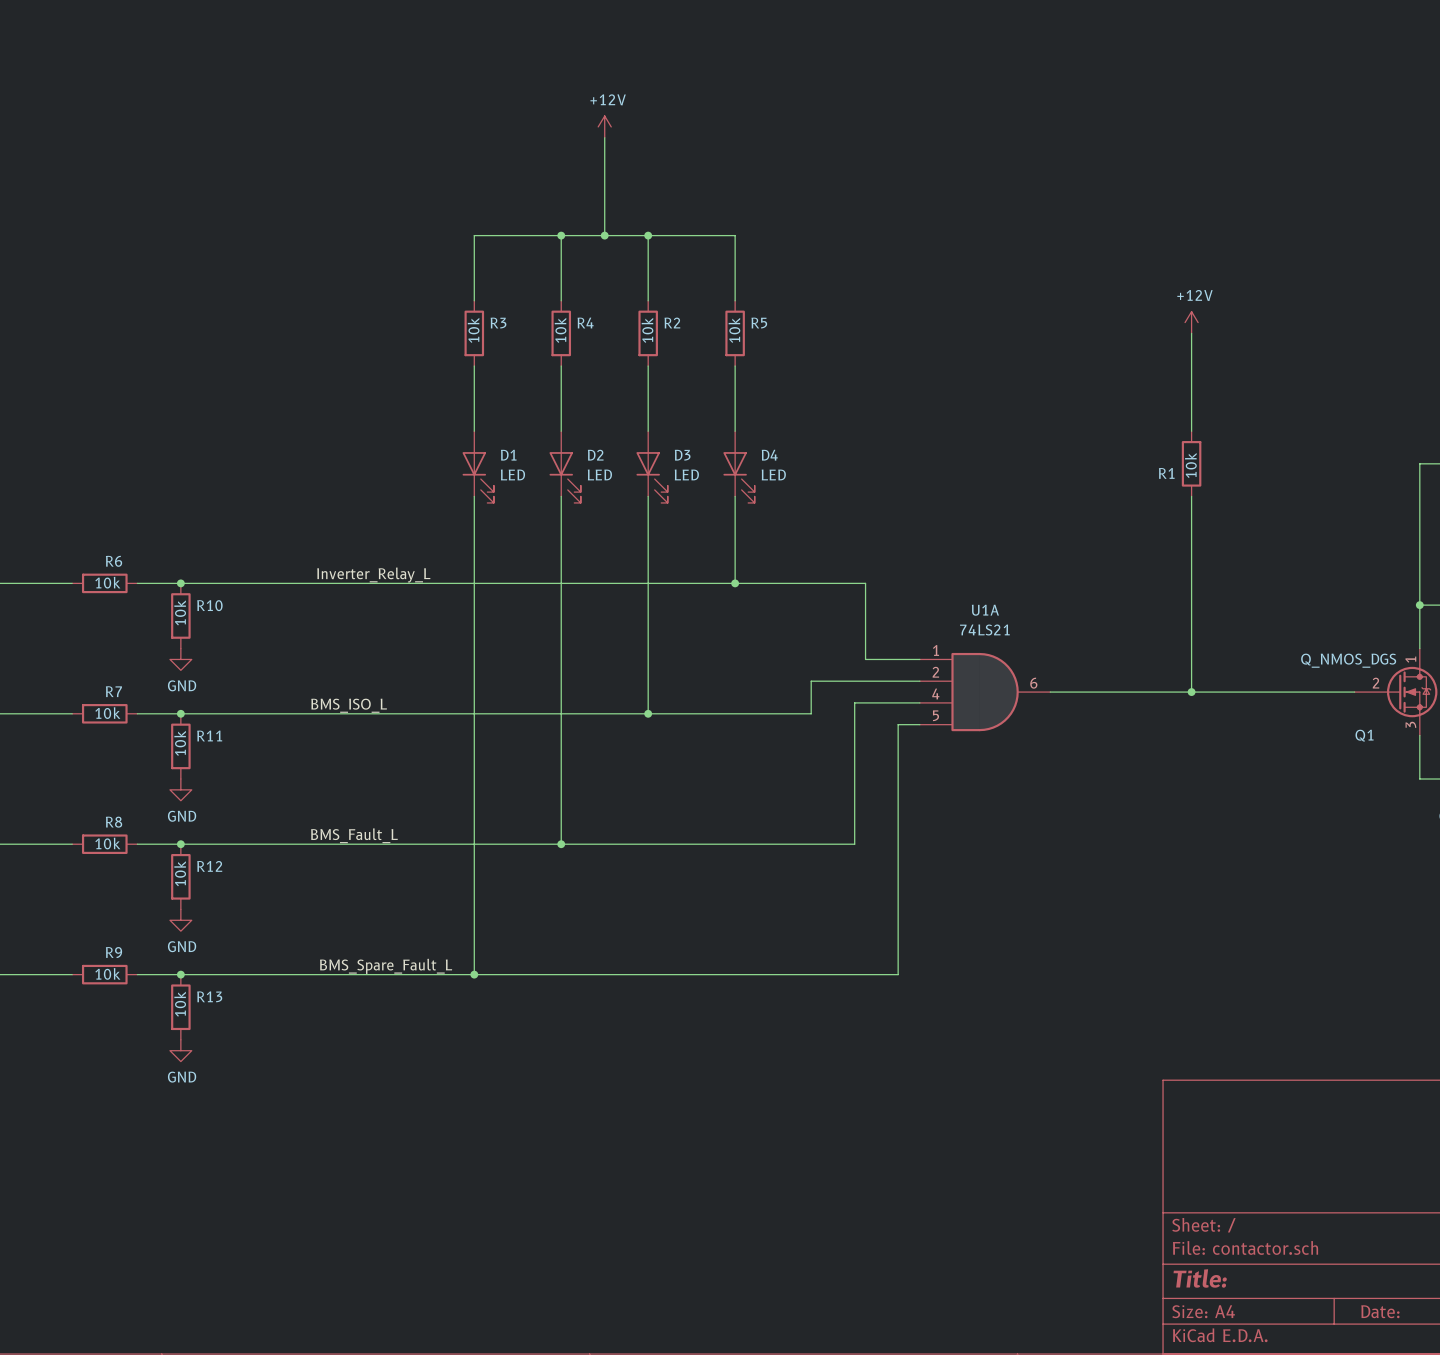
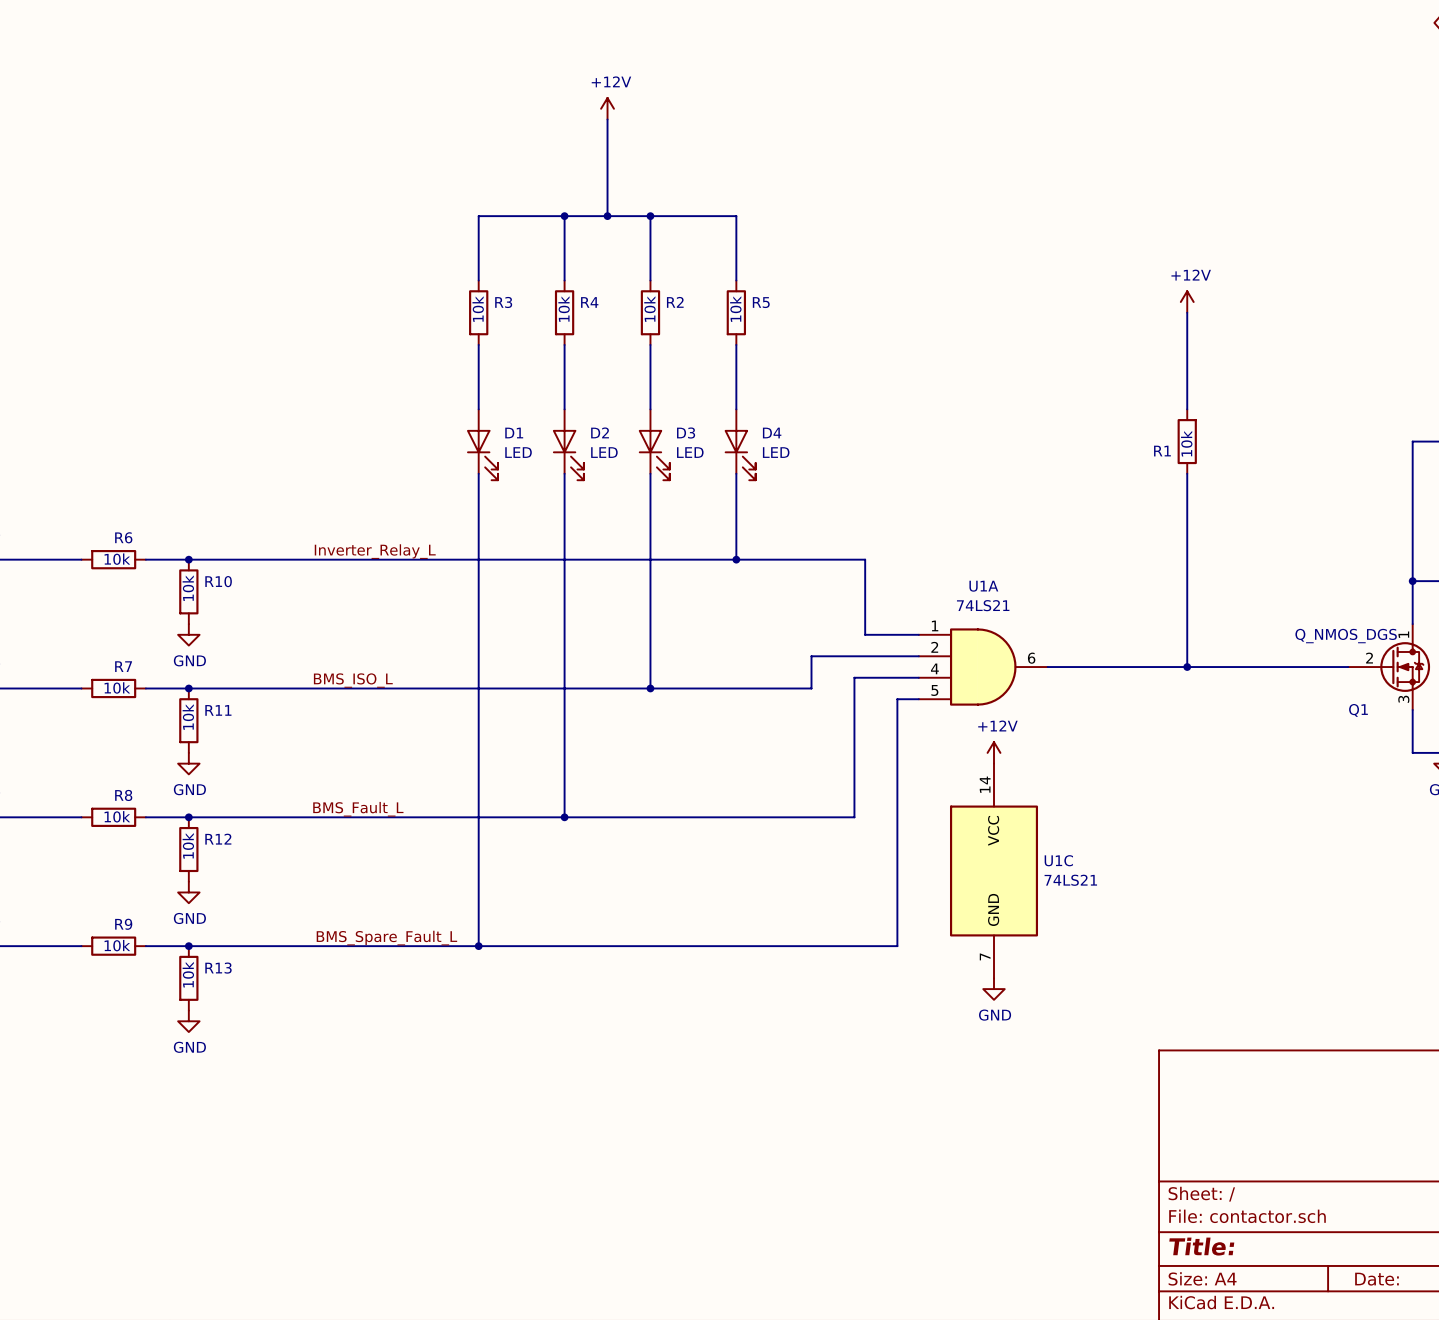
power symbol: none -> +12V (994, 752)
U1C: none -> 74LS21 (994, 870)
power symbol: none -> GND (994, 989)

